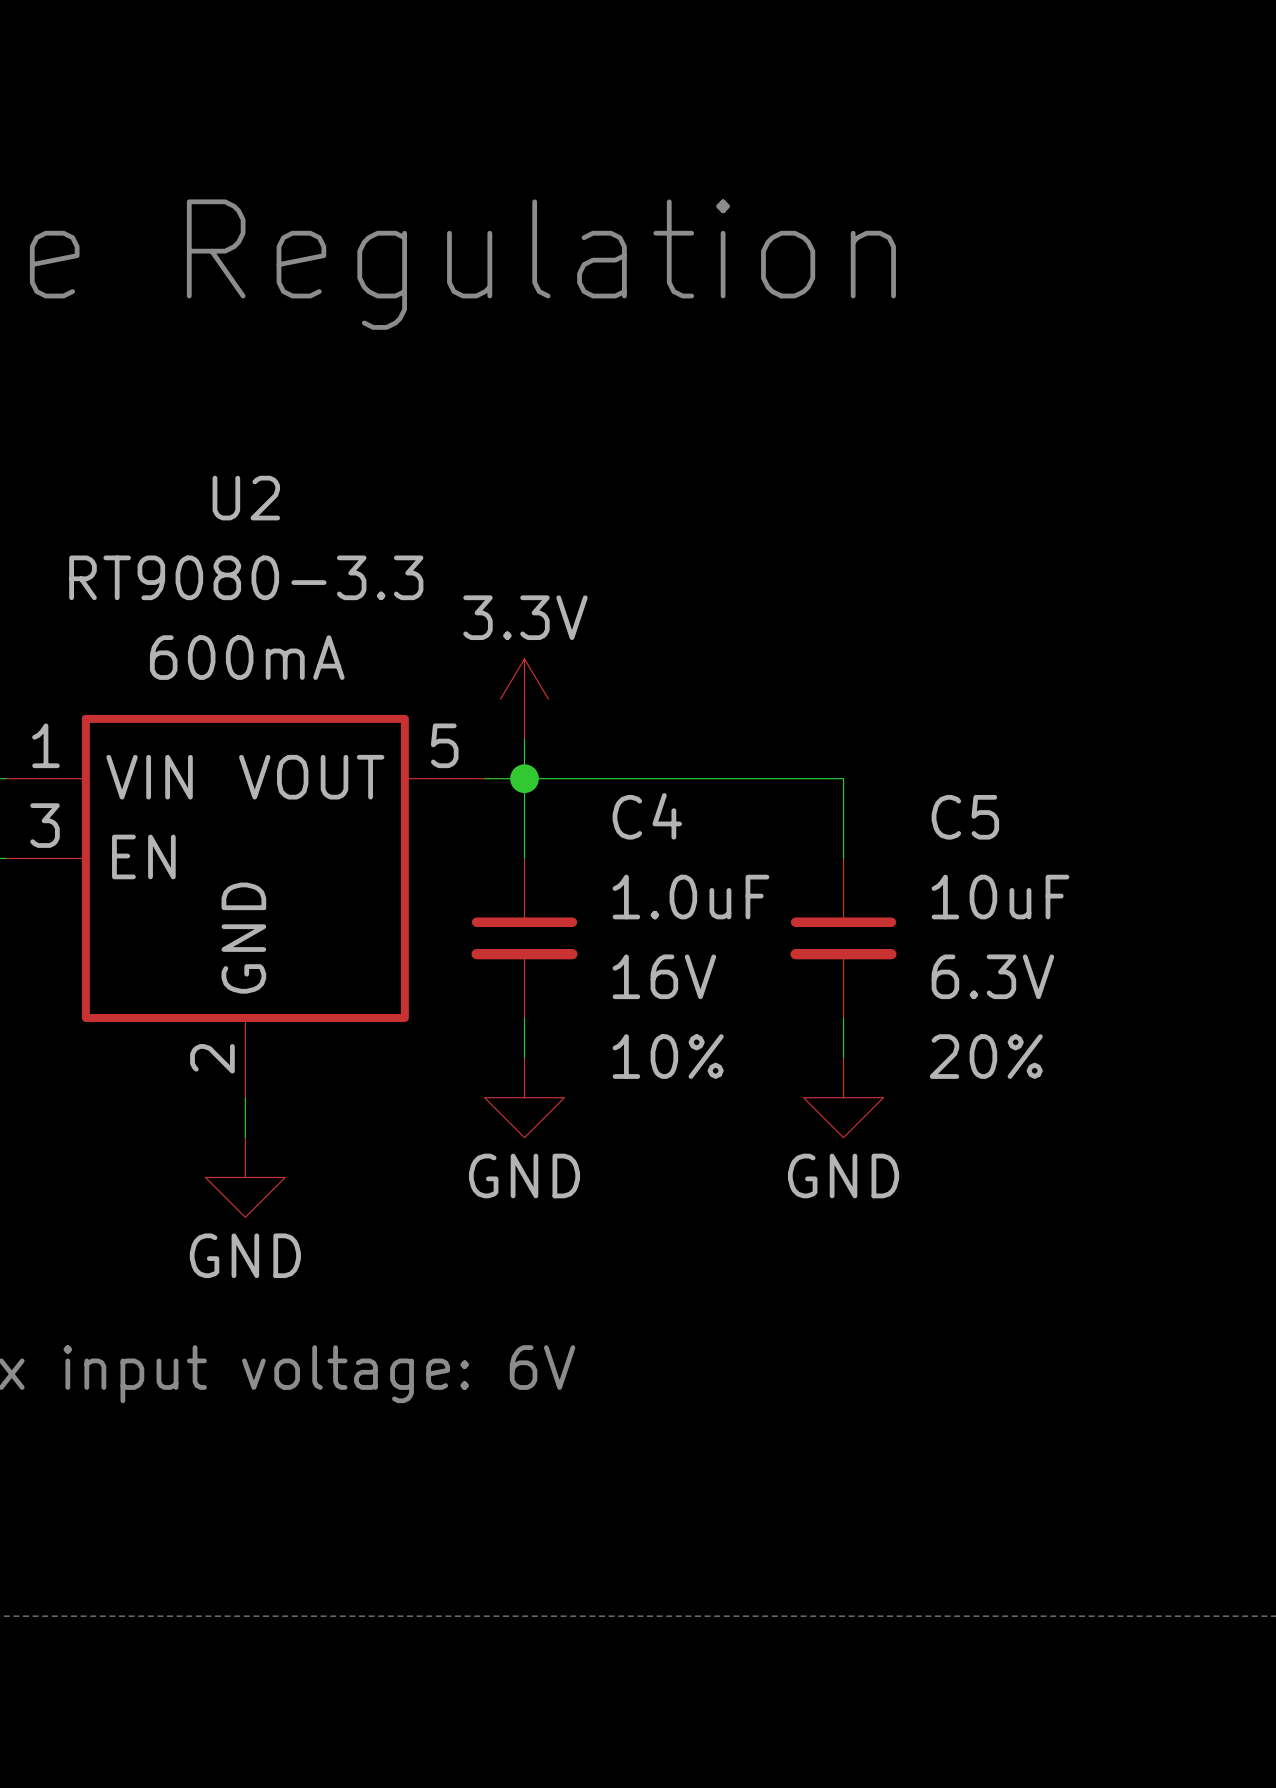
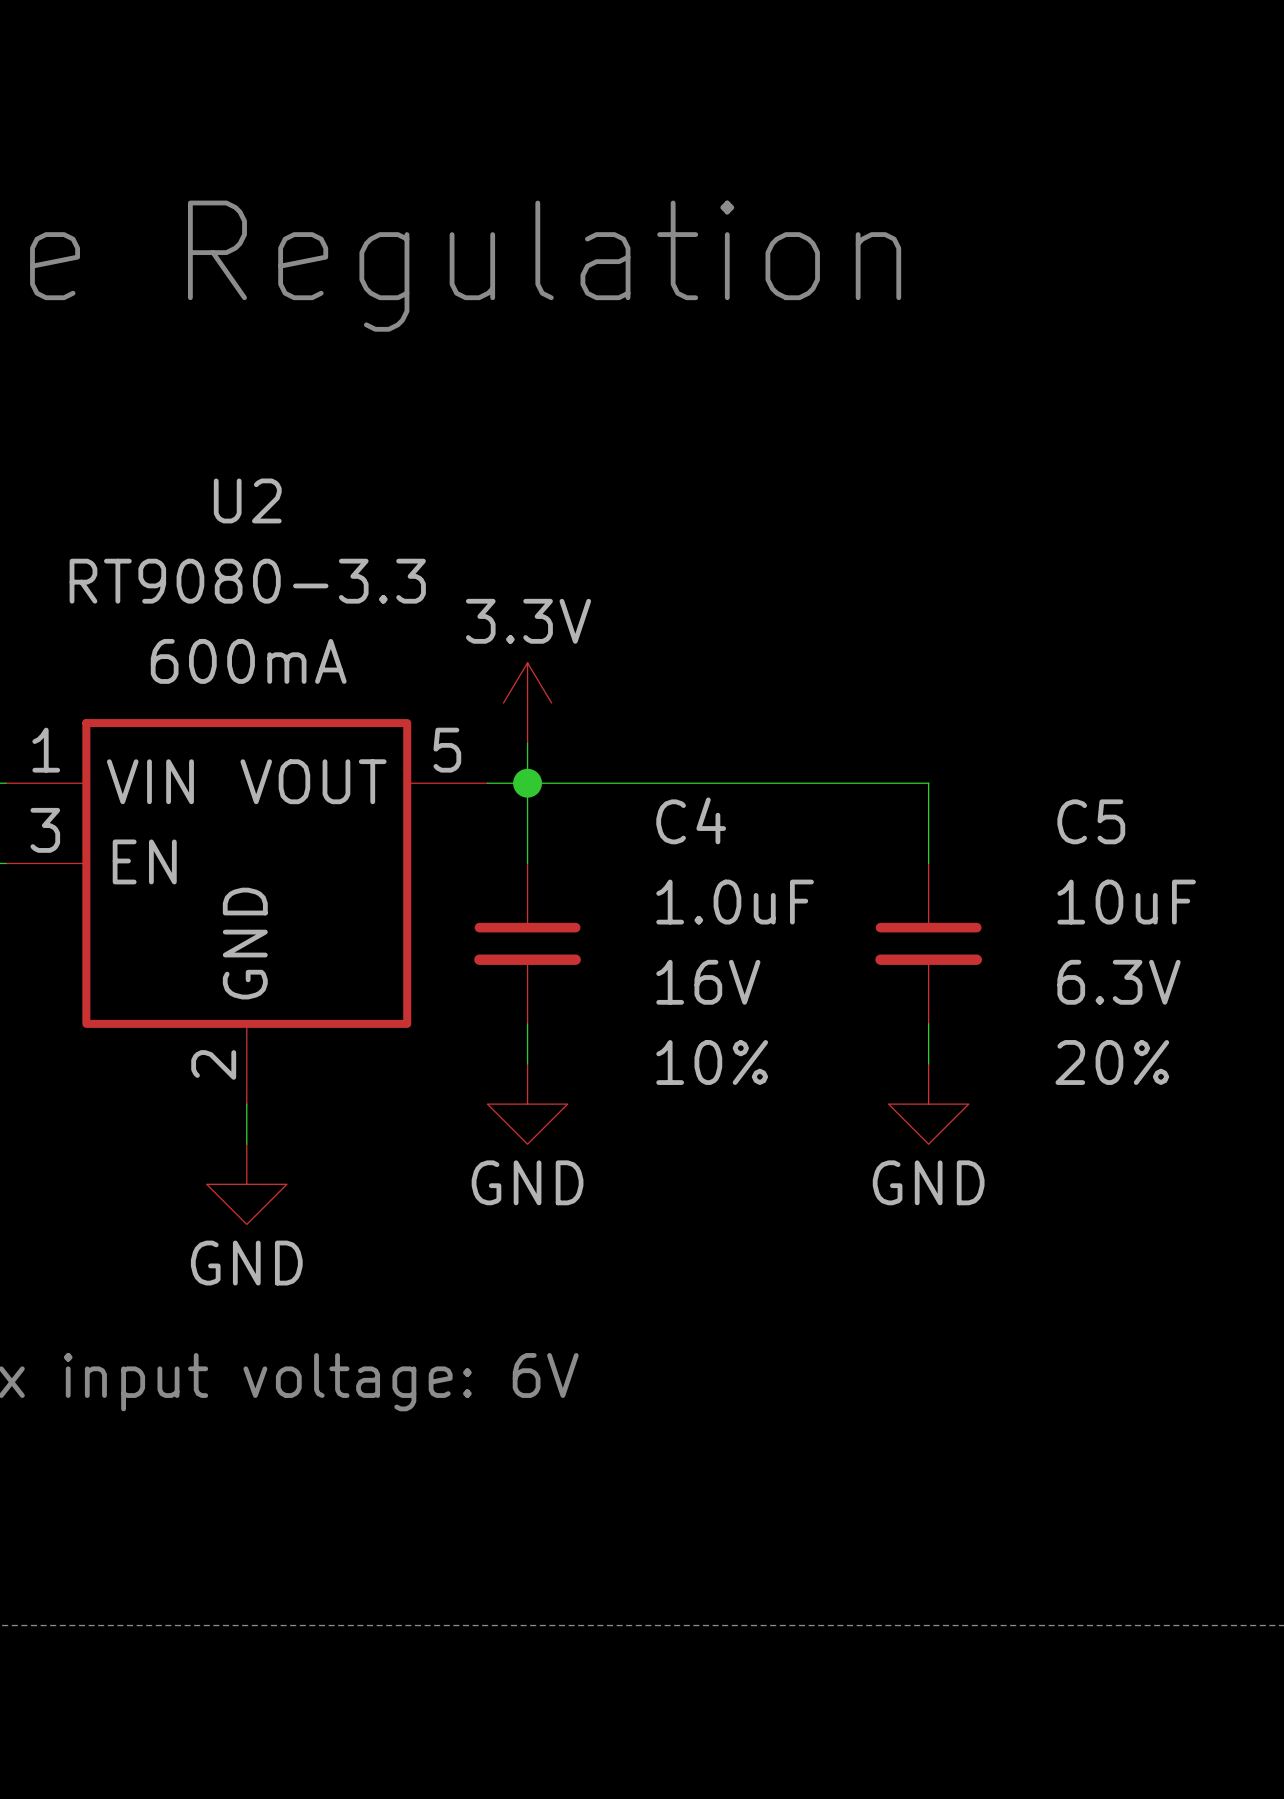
wire: (843, 778) (843, 858) -> (848, 783) (928, 783) (928, 863)
C4 name position: C4 (647, 816) -> C4 (691, 820)
C5 name position: C5 (965, 817) -> C5 (1091, 821)
C4 value position: 1.0uF (690, 897) -> 1.0uF (735, 902)
C5 value position: 10uF (1000, 897) -> 10uF (1126, 902)
C5 position: (843, 938) -> (928, 943)
C4 text position: 16V (664, 976) -> 16V (708, 982)
C5 text position: 6.3V (992, 976) -> 6.3V (1119, 982)
wire: (843, 1017) (843, 1057) -> (928, 1023) (928, 1063)
C4 text position: 10% (668, 1056) -> 10% (712, 1062)
C5 text position: 20% (986, 1056) -> 20% (1112, 1062)
power symbol position: GND (843, 1097) -> GND (928, 1104)

